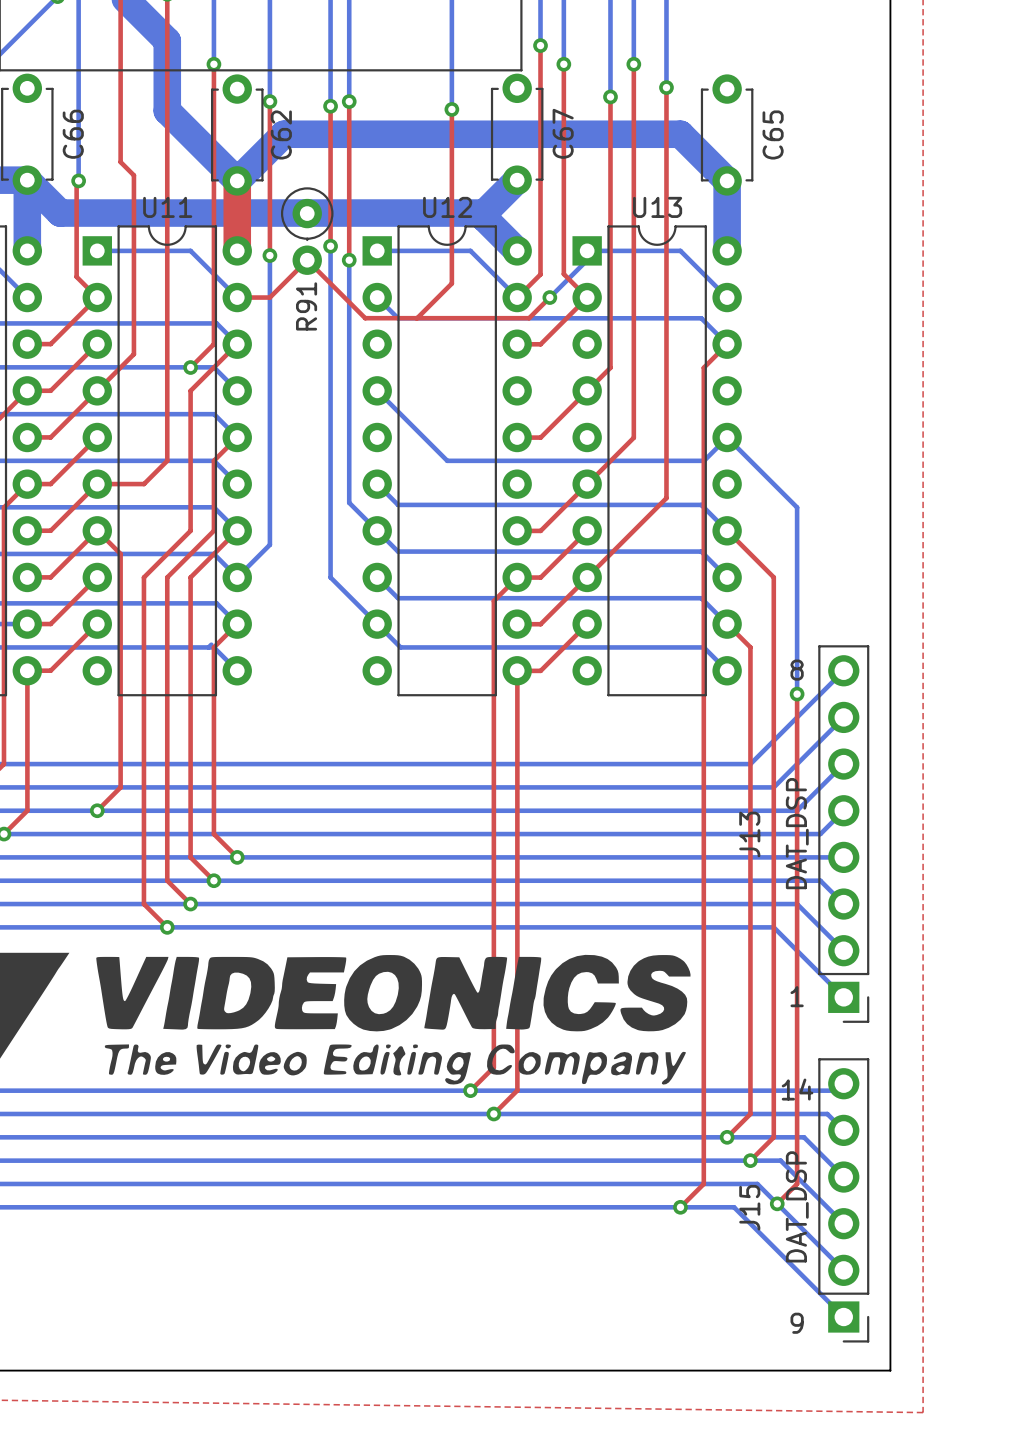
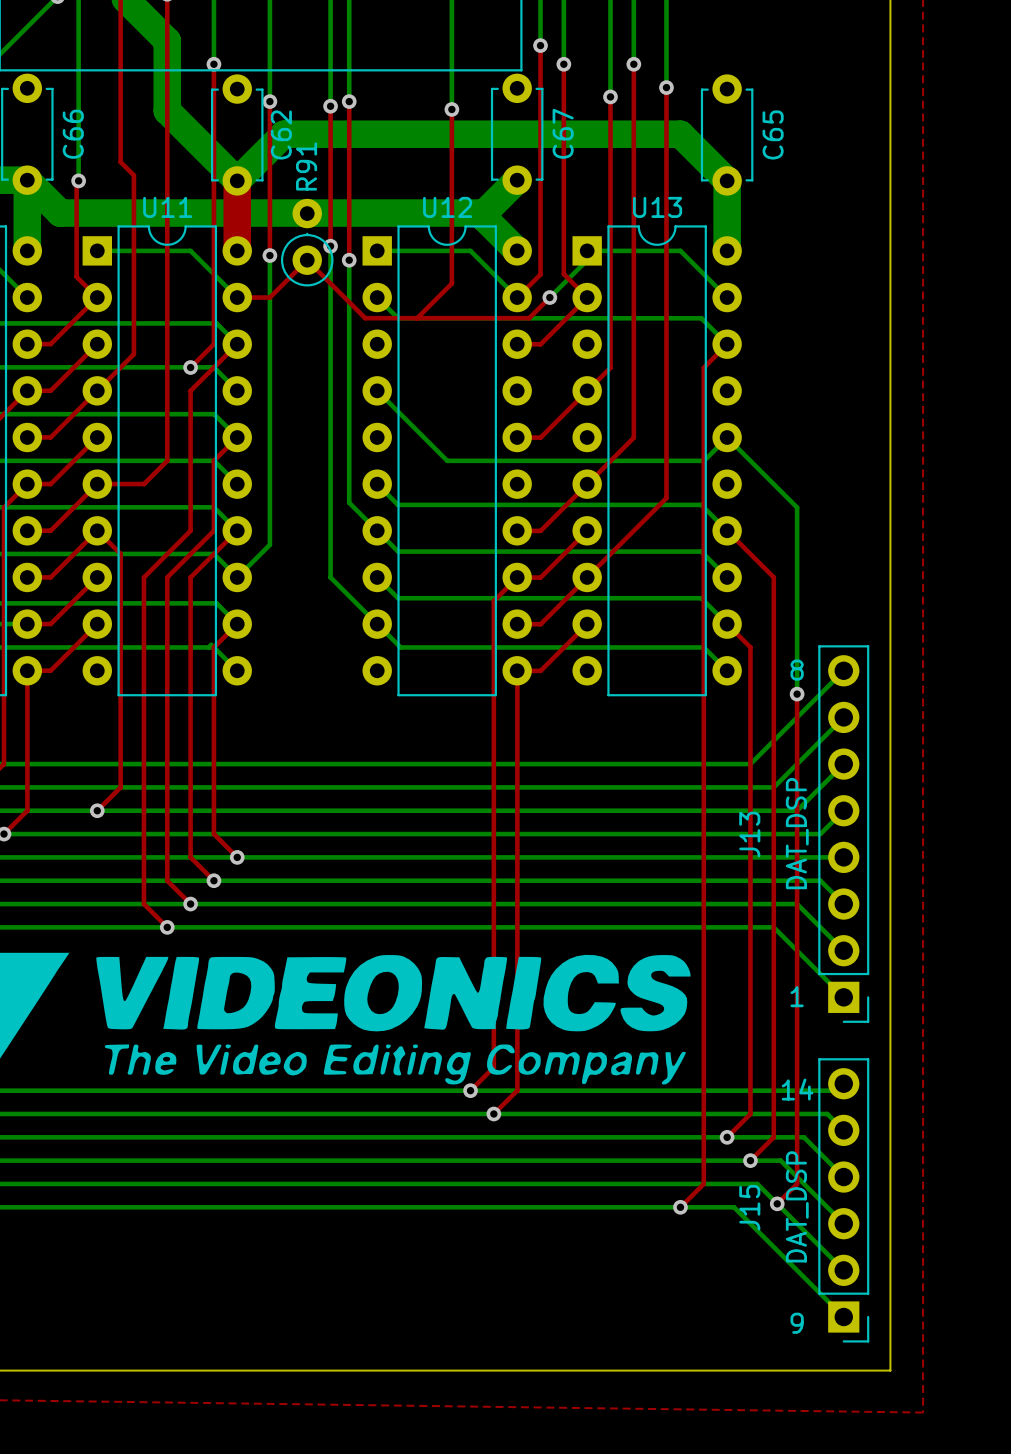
R91 rotation: 0° (307, 231) -> 180° (307, 242)

